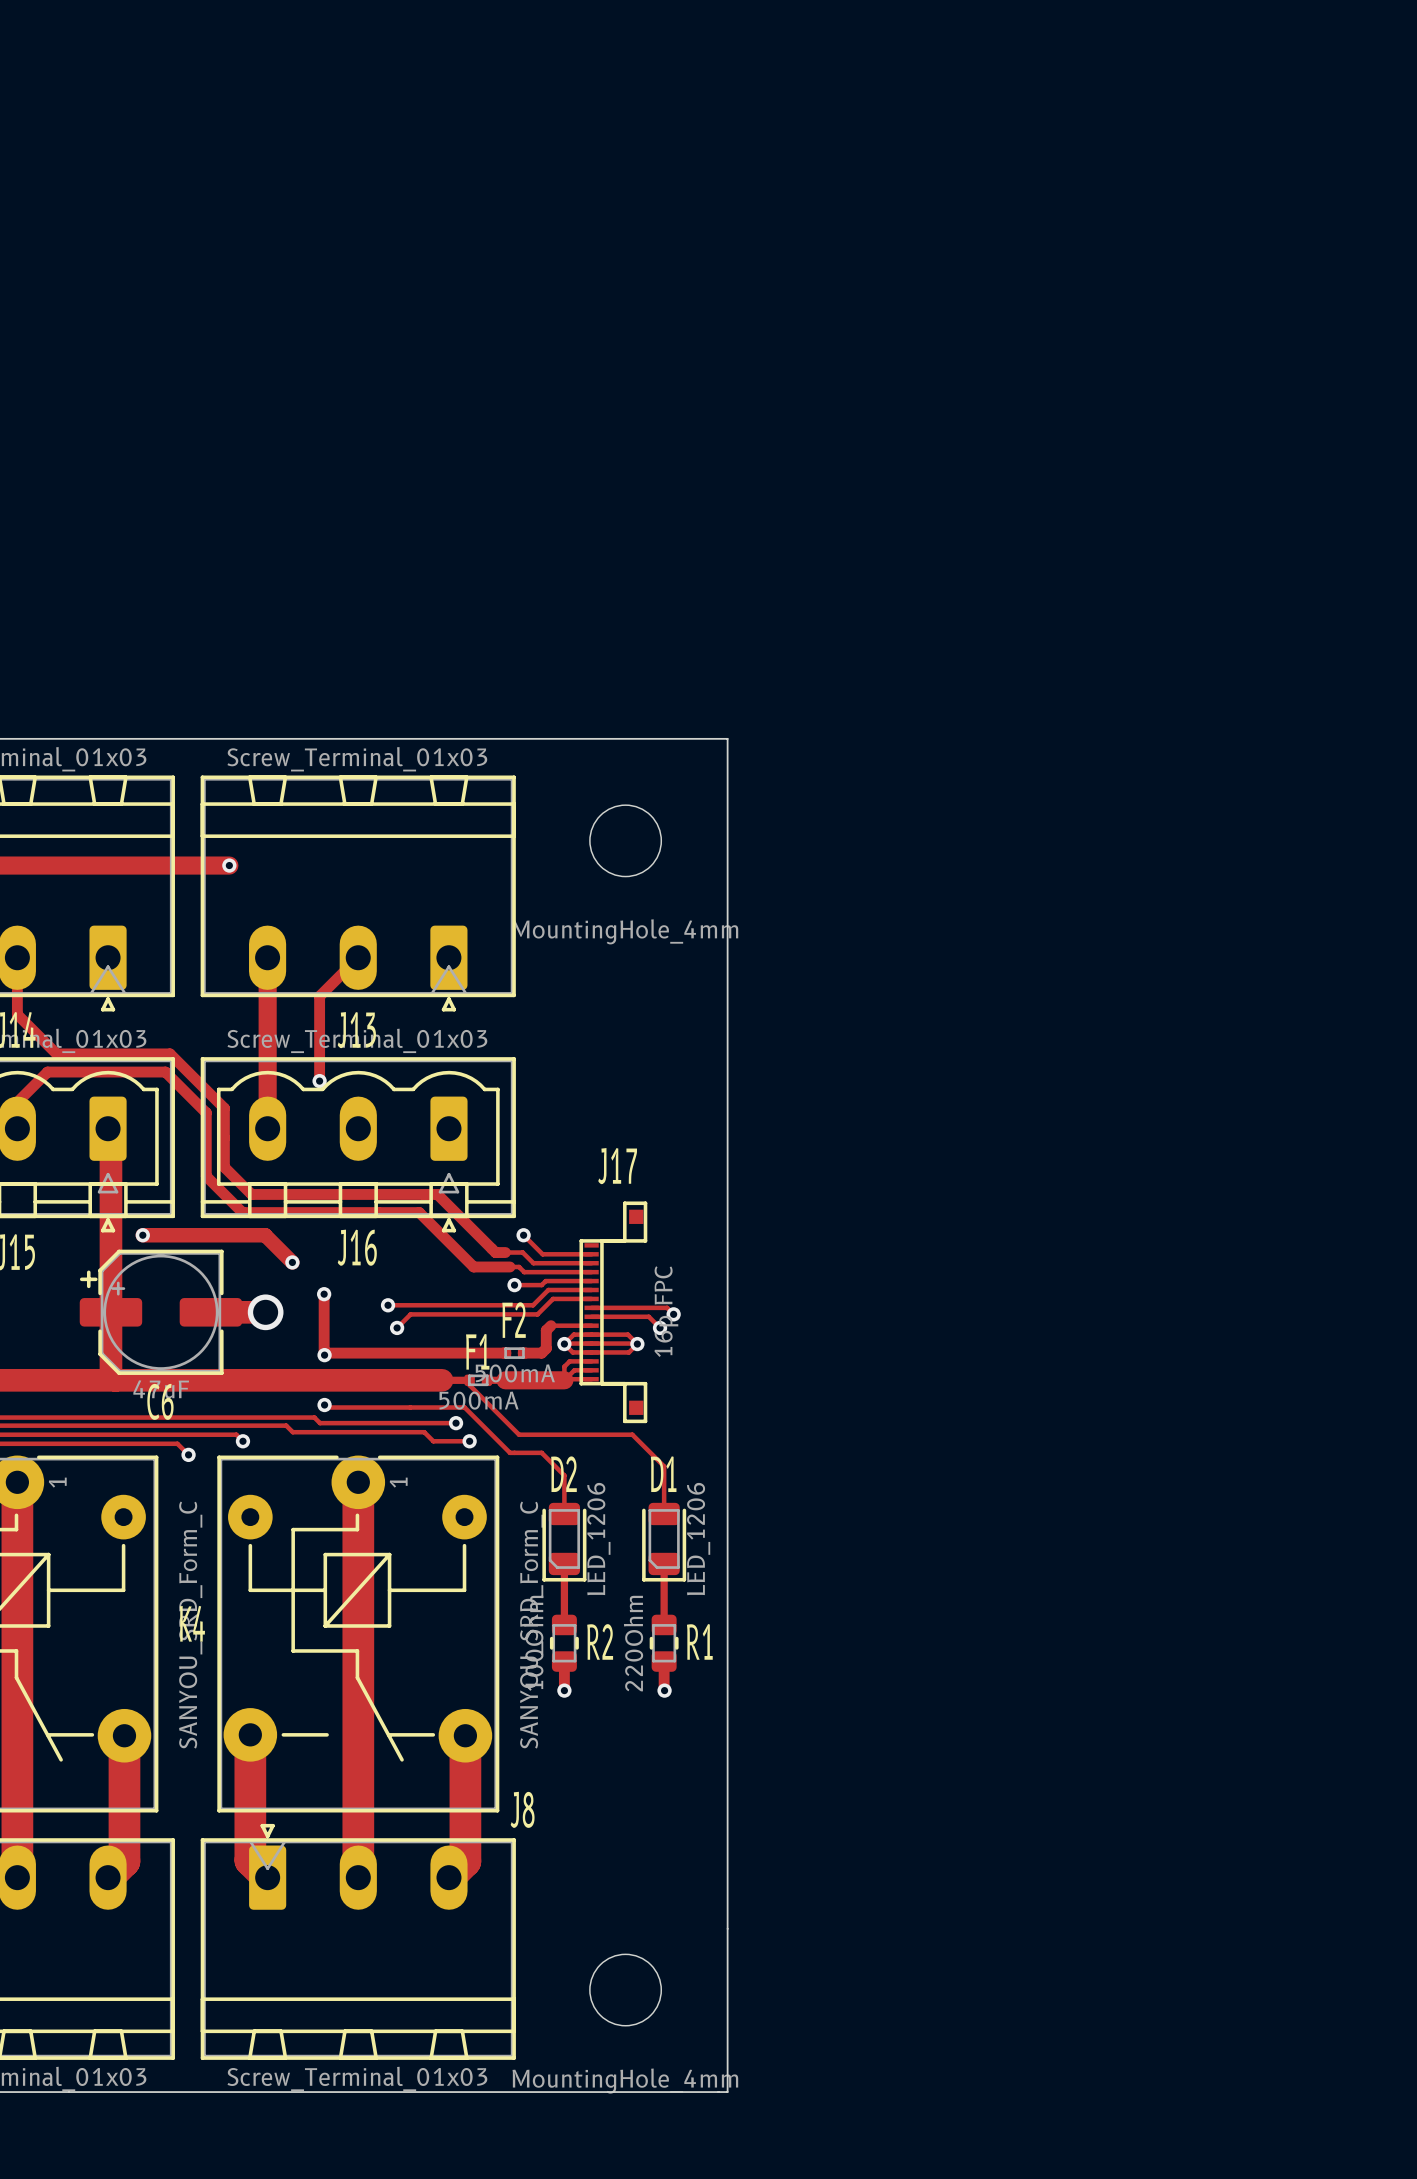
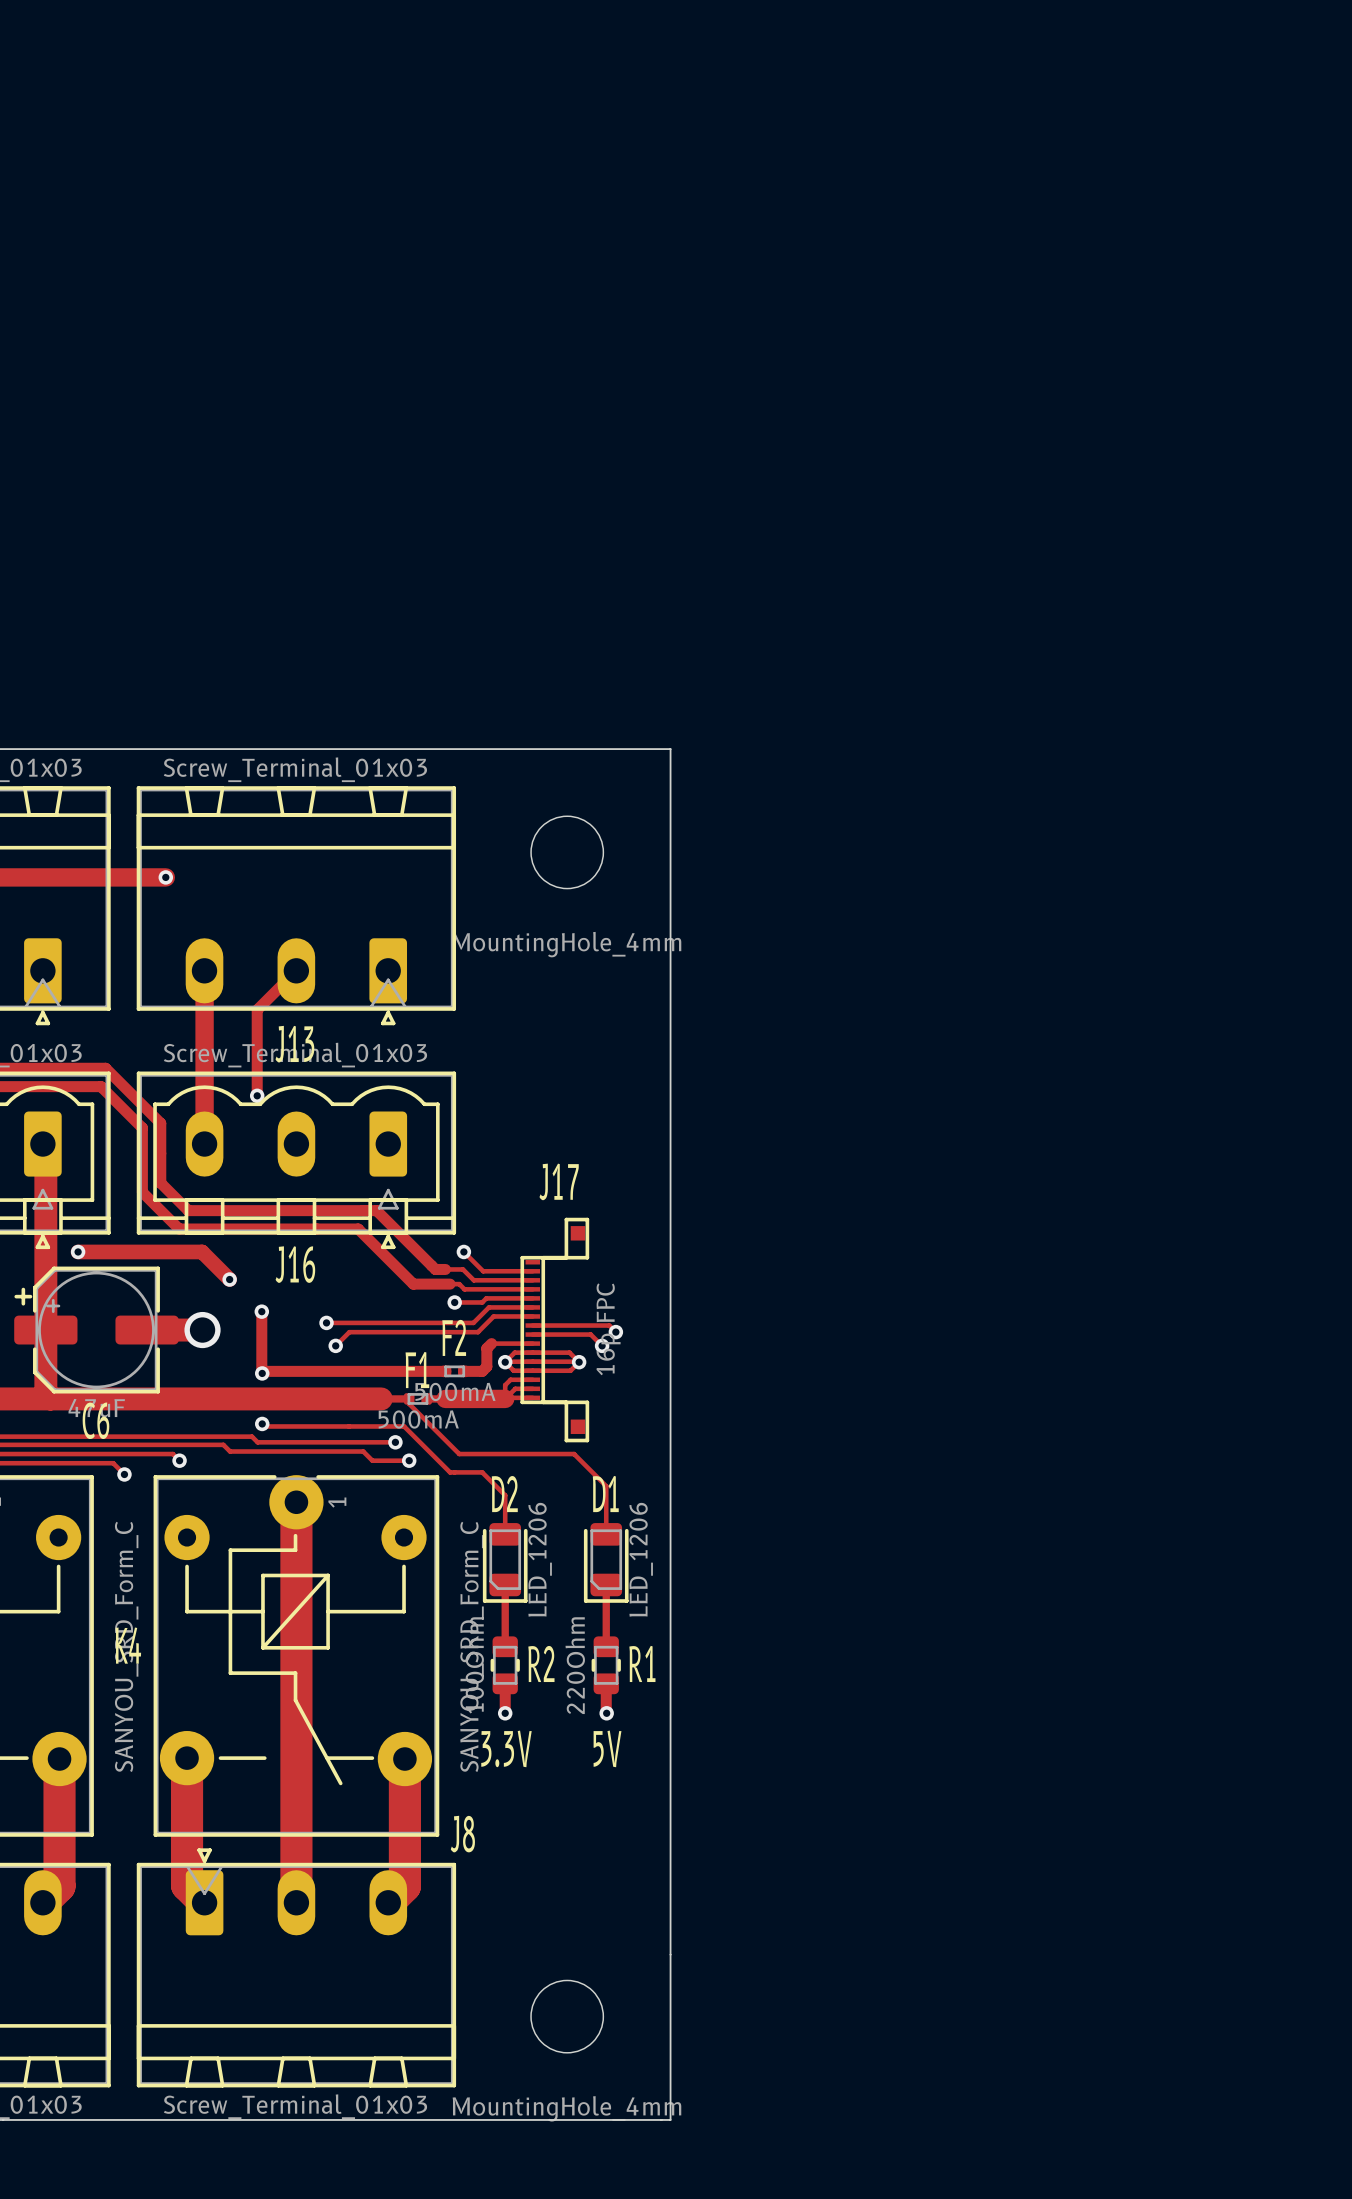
text: none -> 3.3V (506, 1748)
text: none -> 5V (607, 1748)

